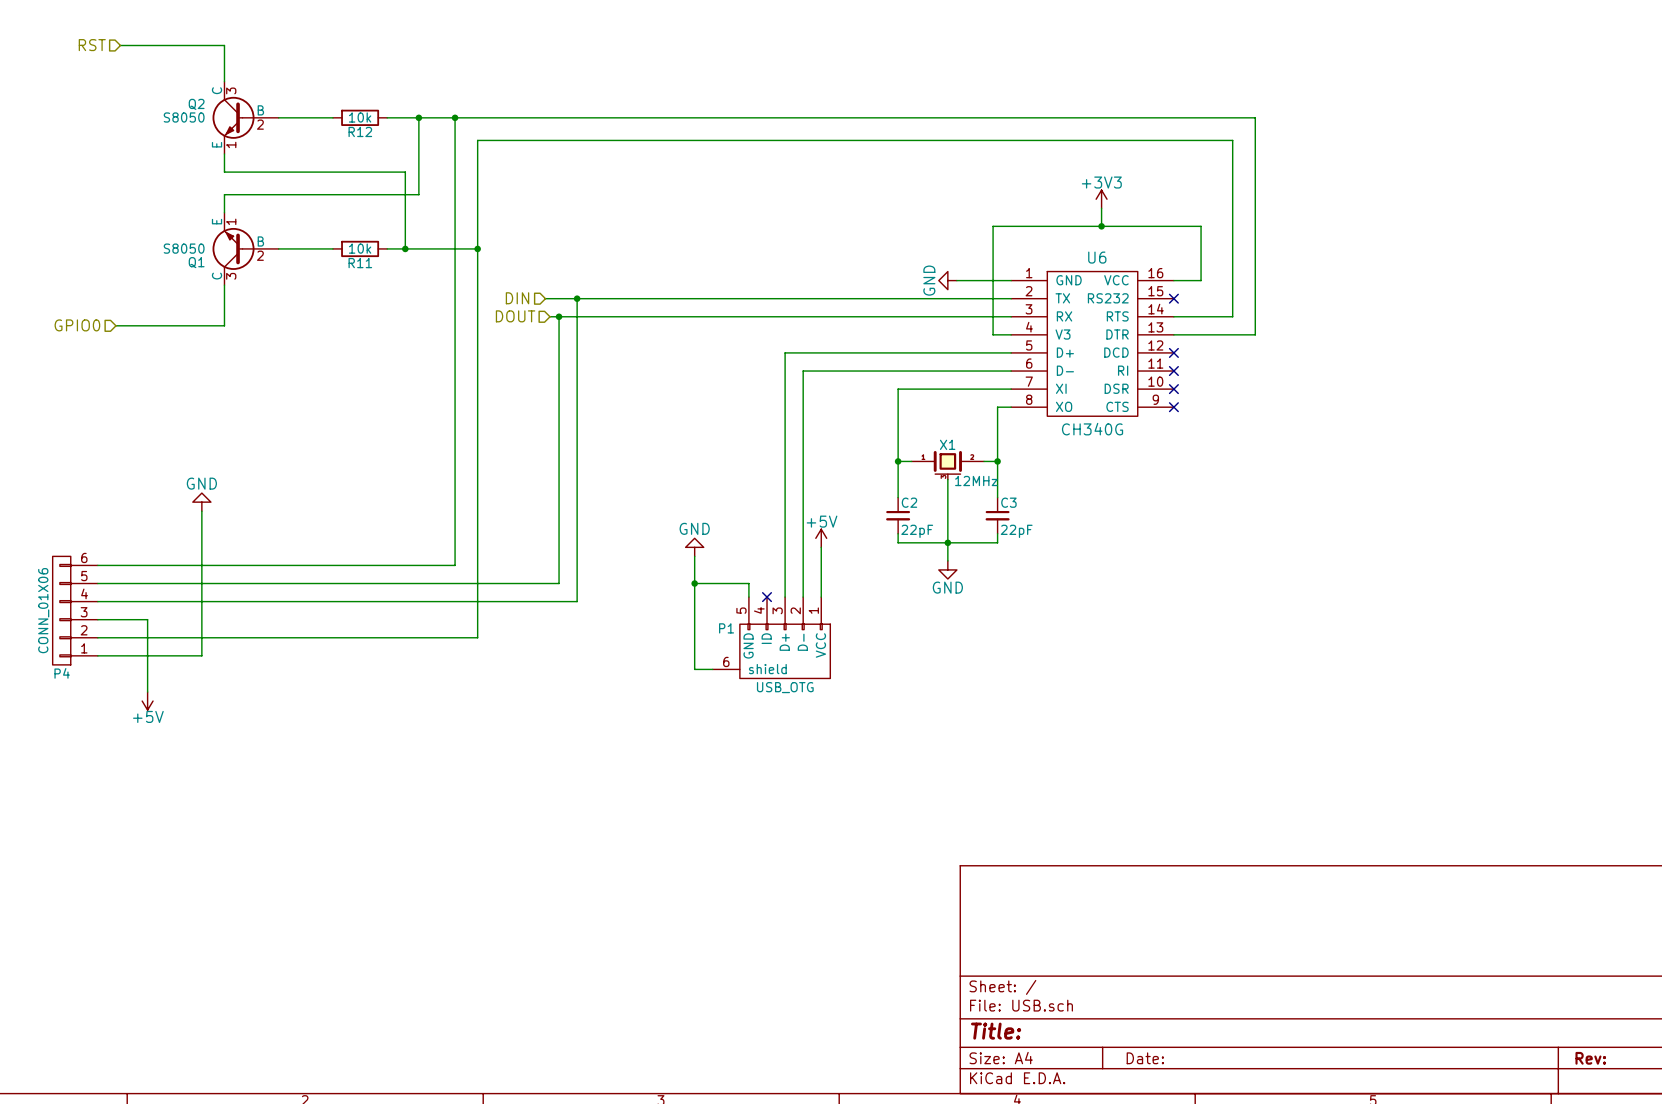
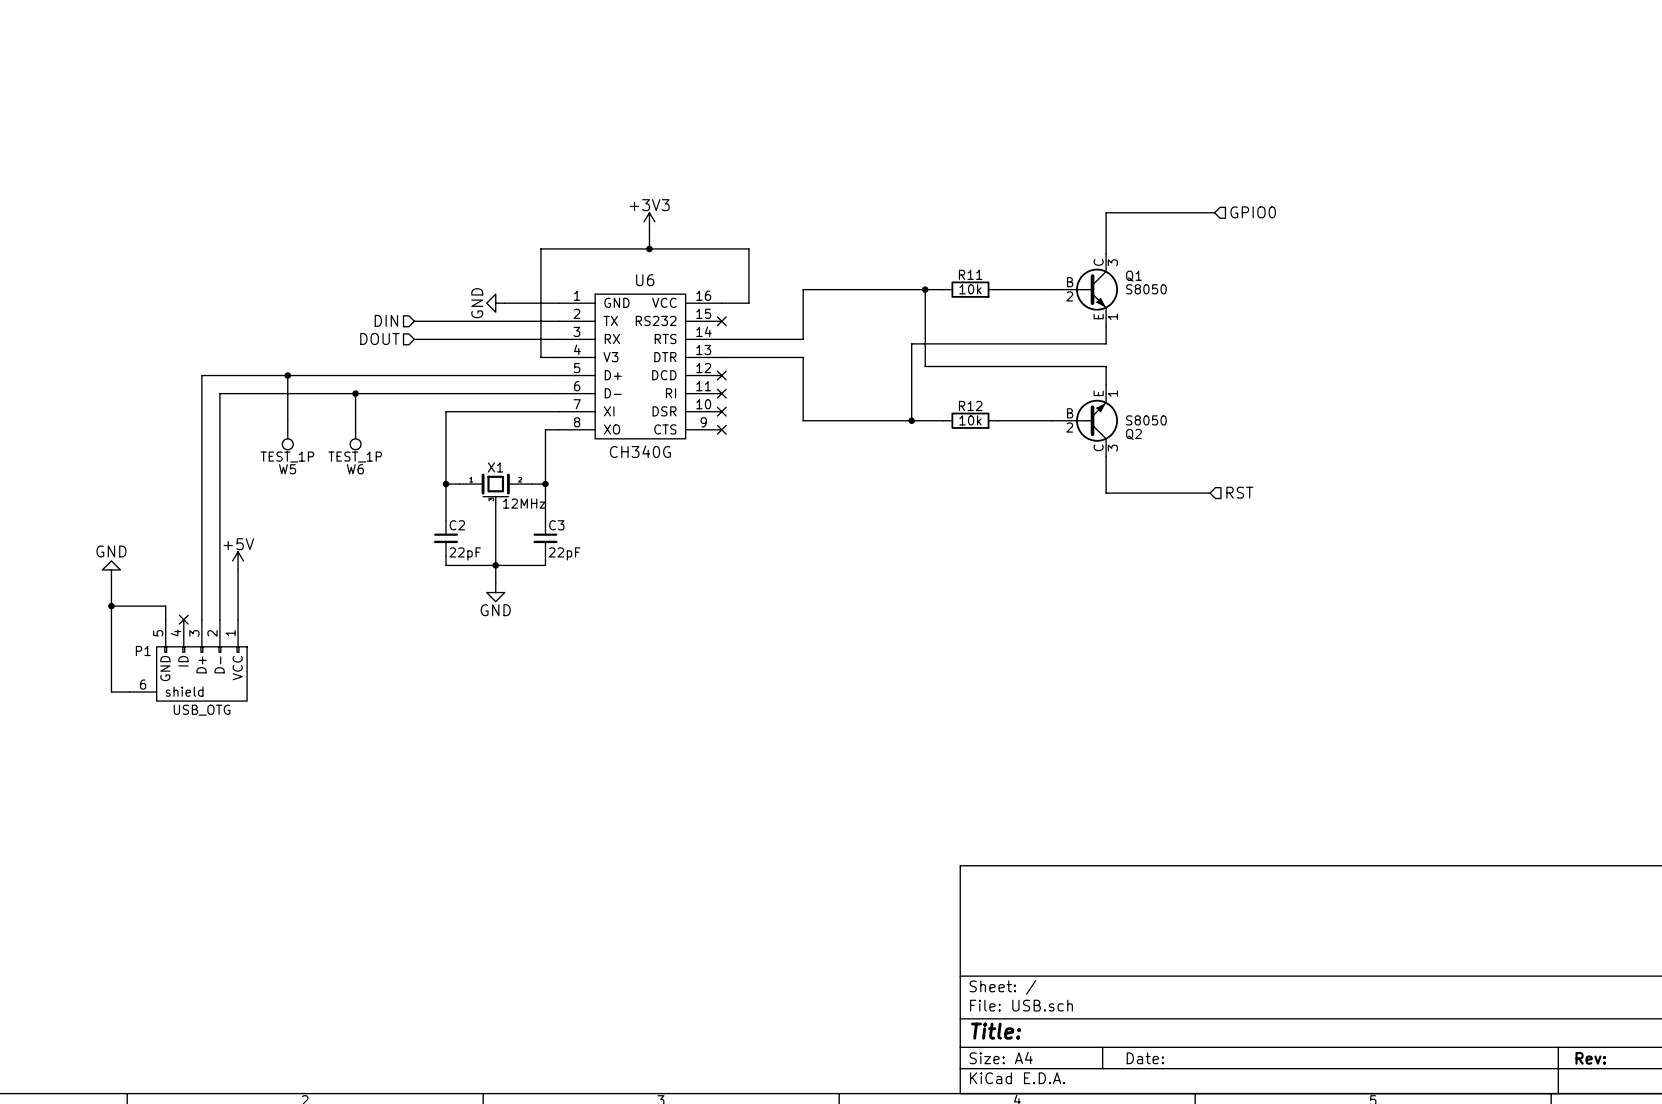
hierarchical label: RST (92, 45) -> none
wire: (120, 45) (224, 45) (224, 81) -> none
Q2 rotation: 0° (233, 117) -> 180° (1097, 420)
Q2 position: (245, 117) -> (1084, 420)
wire: (278, 117) (332, 117) -> none
R12 position: (360, 117) -> (970, 420)
wire: (387, 117) (1255, 117) (1255, 334) (1173, 334) -> none
wire: (418, 117) (418, 194) (224, 194) (224, 212) -> none
junction: (418, 117) -> none
wire: (455, 117) (455, 565) -> (545, 556) (545, 565) (455, 565)
junction: (455, 117) -> none
R12 name position: R12 (360, 131) -> R12 (970, 405)
wire: (224, 154) (224, 172) (405, 172) (405, 248) -> none
power symbol: +3V3 (1101, 199) -> none
wire: (1101, 208) (1101, 226) -> none
wire: none -> (1214, 212) (1106, 212) (1106, 253)
hierarchical label: none -> GPIO0 (1253, 212)
power symbol: none -> +3V3 (649, 221)
junction: (1101, 226) -> none
wire: none -> (649, 230) (649, 248)
Q1 rotation: 0° (233, 248) -> 180° (1097, 289)
Q1 position: (245, 248) -> (1084, 289)
wire: (278, 248) (332, 248) -> none
R11 position: (360, 248) -> (970, 289)
wire: (387, 248) (477, 248) -> none
junction: (405, 248) -> none
junction: (477, 248) -> none
junction: none -> (649, 248)
R11 name position: R11 (360, 263) -> R11 (970, 274)
power symbol: GND (947, 280) -> none
wire: (956, 280) (1011, 280) -> (997, 289) (1051, 289)
wire: (1173, 280) (1201, 280) (1201, 226) (993, 226) (993, 334) (1011, 334) -> none
wire: (224, 285) (224, 325) (115, 325) -> none
wire: none -> (925, 289) (925, 366) (1106, 366) (1106, 384)
junction: none -> (925, 289)
wire: none -> (943, 289) (803, 289) (803, 339) (721, 339)
hierarchical label position: DIN (517, 298) -> DIN (386, 320)
wire: (545, 298) (1011, 298) -> none
wire: (577, 298) (577, 601) (97, 601) -> none
junction: (577, 298) -> none
no-connect mark: (1173, 298) -> none
power symbol: none -> GND (495, 303)
wire: none -> (504, 303) (559, 303)
wire: none -> (721, 303) (748, 303) (748, 248) (540, 248) (540, 357) (559, 357)
hierarchical label position: DOUT (515, 316) -> DOUT (379, 338)
wire: (549, 316) (1011, 316) -> none
wire: (559, 316) (559, 583) (97, 583) -> none
junction: (559, 316) -> none
wire: (1173, 316) (1232, 316) (1232, 140) (477, 140) (477, 637) (97, 637) -> none
wire: none -> (414, 321) (559, 321)
no-connect mark: none -> (721, 321)
hierarchical label: GPIO0 (77, 325) -> none
wire: none -> (1106, 325) (1106, 343) (911, 343) (911, 420)
wire: none -> (414, 339) (559, 339)
U6 position: (1092, 343) -> (640, 366)
wire: (1011, 352) (785, 352) (785, 597) -> none
no-connect mark: (1173, 352) -> none
wire: (803, 371) (1011, 371) -> (803, 371) (803, 357) (721, 357)
no-connect mark: (1173, 371) -> none
wire: none -> (287, 375) (287, 420)
junction: none -> (287, 375)
wire: none -> (559, 375) (201, 375) (201, 511)
no-connect mark: none -> (721, 375)
wire: (1011, 389) (898, 389) (898, 497) -> none
no-connect mark: (1173, 389) -> none
wire: none -> (355, 393) (355, 420)
junction: none -> (355, 393)
wire: none -> (559, 393) (219, 393) (219, 619)
no-connect mark: none -> (721, 393)
wire: (1011, 407) (997, 407) (997, 497) -> none
no-connect mark: (1173, 407) -> none
wire: none -> (559, 411) (446, 411) (446, 520)
no-connect mark: none -> (721, 411)
wire: (803, 420) (803, 597) -> (803, 420) (943, 420)
junction: none -> (911, 420)
wire: none -> (997, 420) (1051, 420)
wire: none -> (559, 429) (545, 429) (545, 520)
no-connect mark: none -> (721, 429)
W5: none -> TEST_1P (287, 435)
W6: none -> TEST_1P (355, 435)
wire: none -> (1106, 456) (1106, 493) (1210, 493)
wire: (898, 461) (911, 461) -> none
junction: (898, 461) -> none
wire: (984, 461) (997, 461) -> none
junction: (997, 461) -> none
X1 position: (947, 465) -> (495, 487)
wire: (947, 479) (947, 560) -> none
wire: none -> (446, 484) (459, 484)
junction: none -> (446, 484)
wire: none -> (531, 484) (545, 484)
junction: none -> (545, 484)
hierarchical label: none -> RST (1239, 492)
power symbol position: GND (201, 502) -> GND (111, 569)
wire: none -> (495, 502) (495, 583)
C2 position: (898, 515) -> (446, 538)
C3 position: (997, 515) -> (545, 538)
wire: (898, 533) (898, 542) (997, 542) (997, 533) -> none
power symbol: +5V (821, 538) -> none
junction: (947, 542) -> none
power symbol: GND (694, 547) -> none
wire: (821, 547) (821, 597) -> none
wire: (694, 556) (694, 669) (712, 669) -> none
wire: (97, 565) (446, 565) -> (446, 556) (446, 565)
junction: none -> (495, 565)
wire: none -> (238, 569) (238, 619)
power symbol: GND (947, 569) -> none
wire: none -> (111, 578) (111, 692) (129, 692)
wire: (694, 583) (748, 583) (748, 597) -> none
junction: (694, 583) -> none
power symbol: none -> GND (495, 592)
no-connect mark: (767, 597) -> none
wire: none -> (111, 606) (165, 606) (165, 619)
junction: none -> (111, 606)
P4: CONN_01X06 (75, 610) -> none
wire: (97, 619) (147, 619) (147, 692) -> none
no-connect mark: none -> (183, 619)
wire: (201, 619) (201, 655) (97, 655) -> none
P1 position: (771, 637) -> (188, 660)
power symbol rotation: 0° (147, 701) -> 180° (238, 560)
power symbol position: +5V (147, 701) -> +5V (238, 560)

